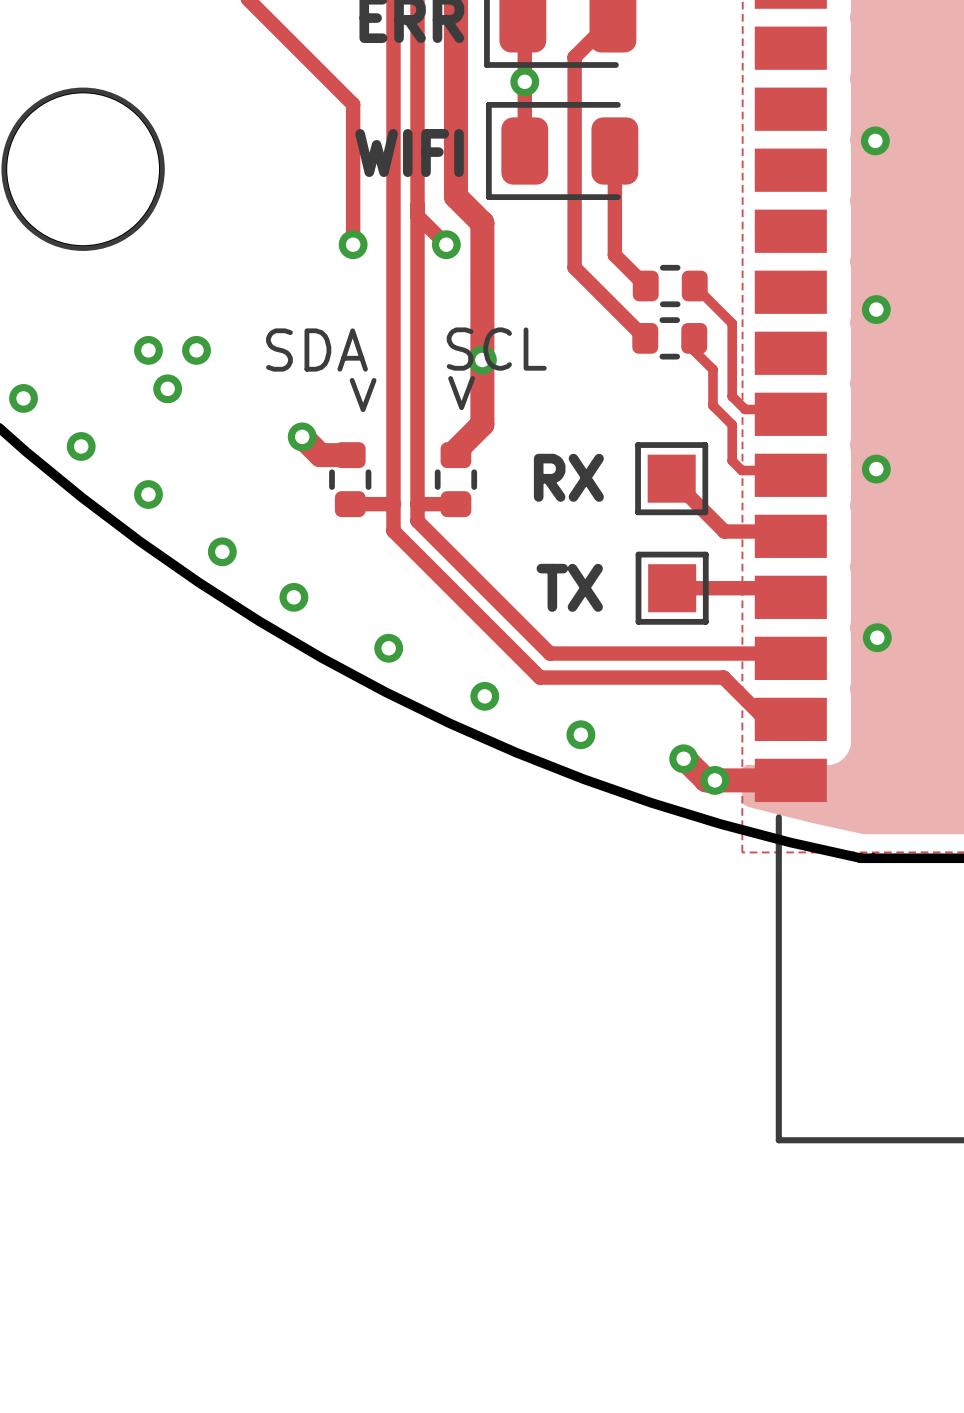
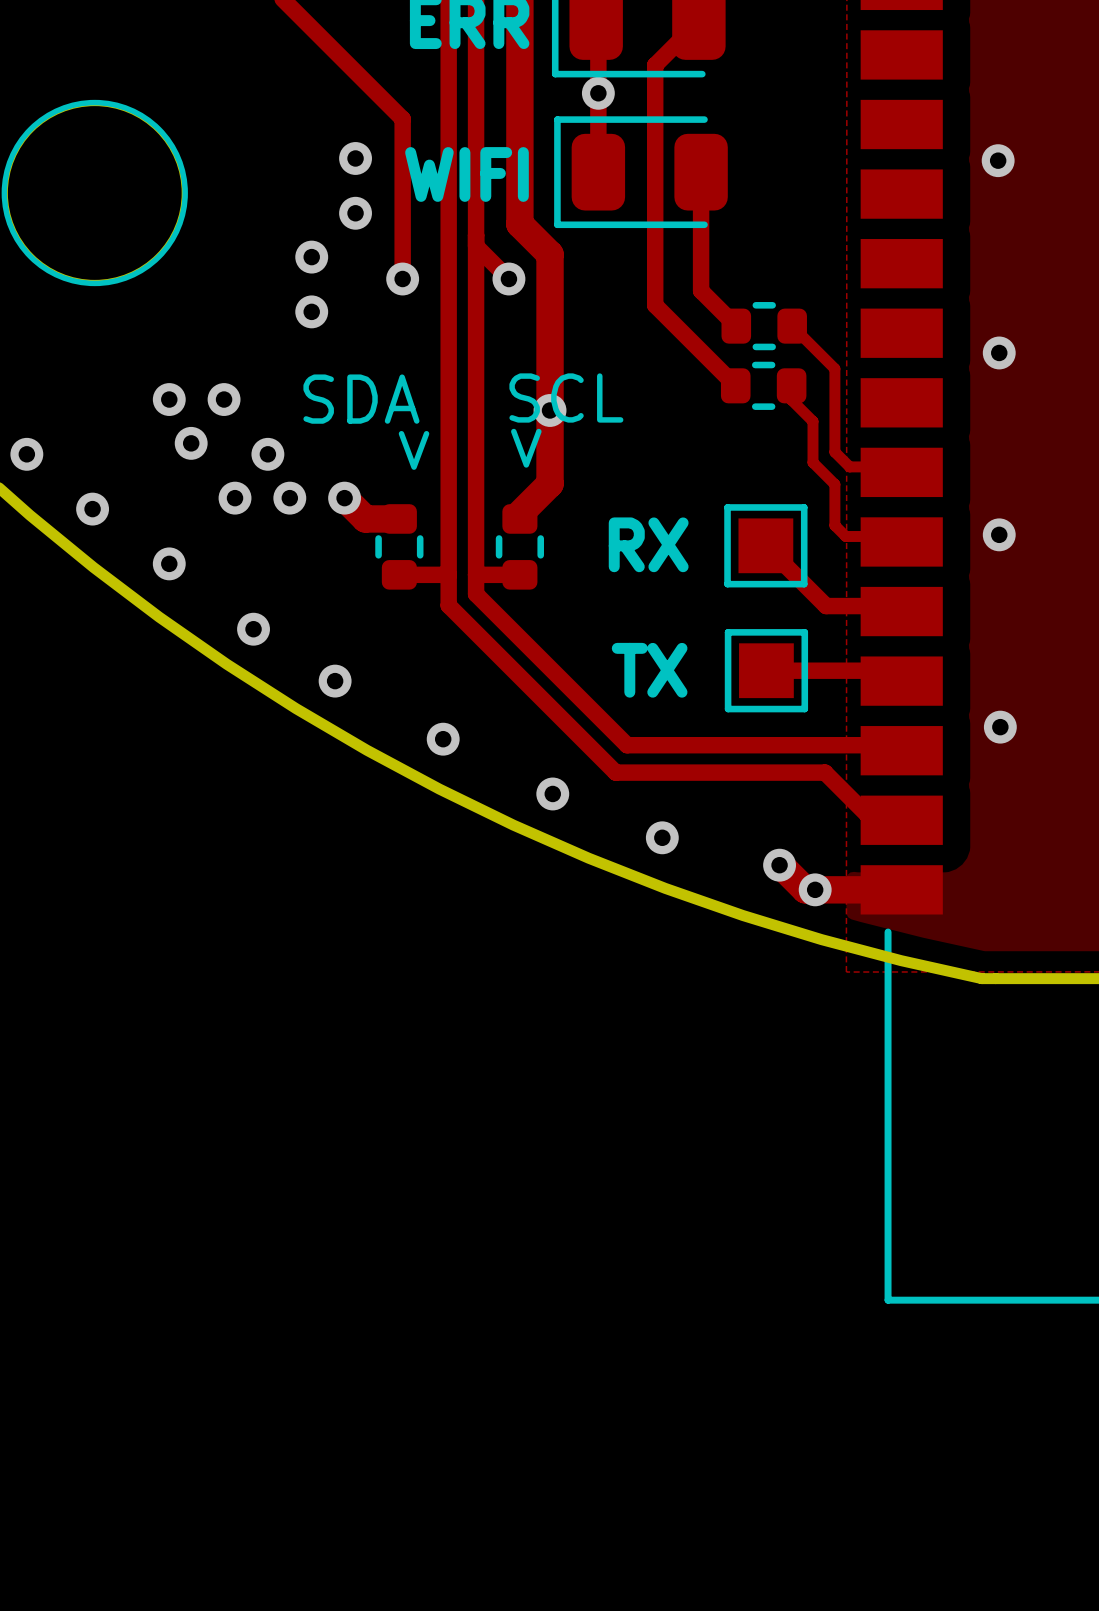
via: none -> (355, 158)
via: none -> (355, 213)
via: none -> (311, 257)
via: none -> (311, 311)
via: none -> (267, 454)
via: none -> (235, 498)
via: none -> (289, 498)

